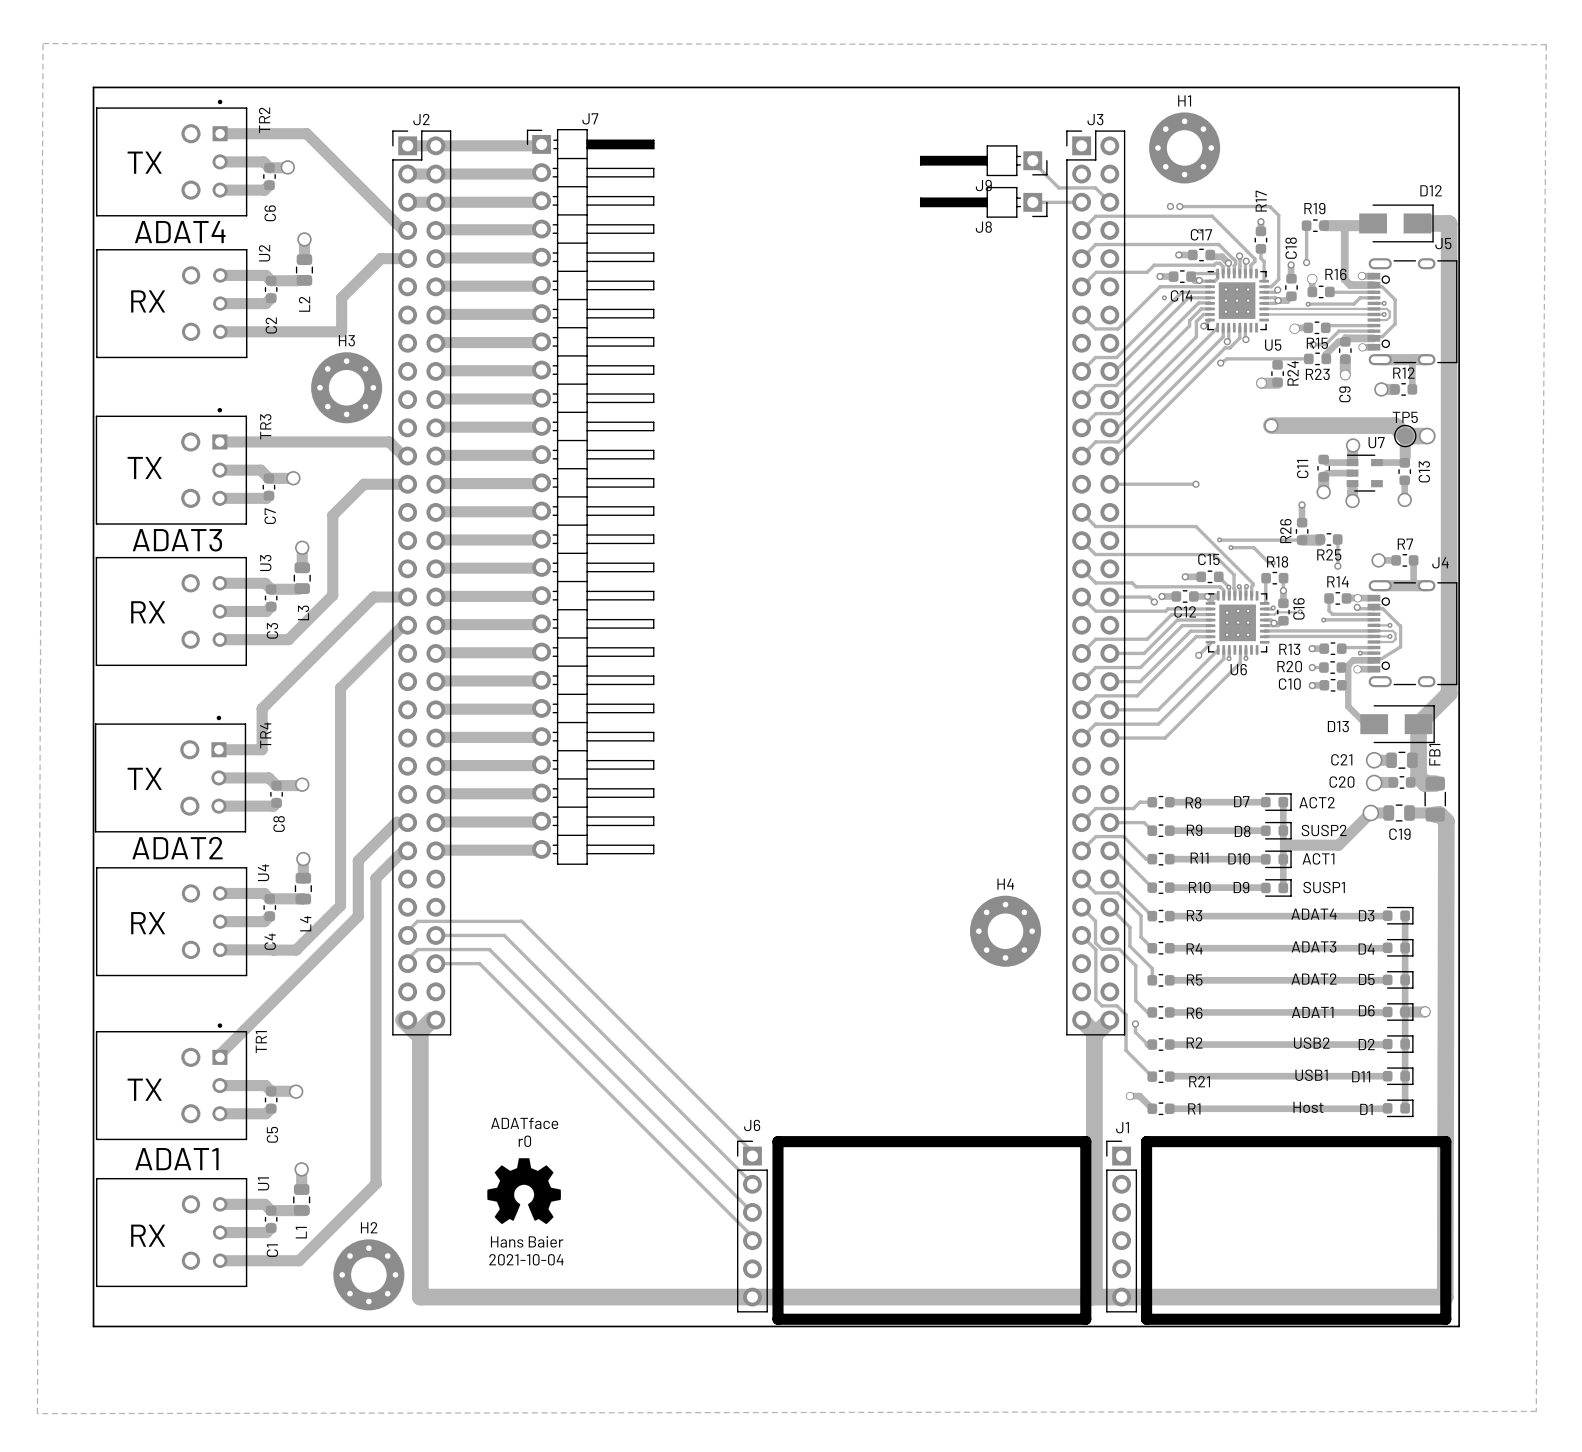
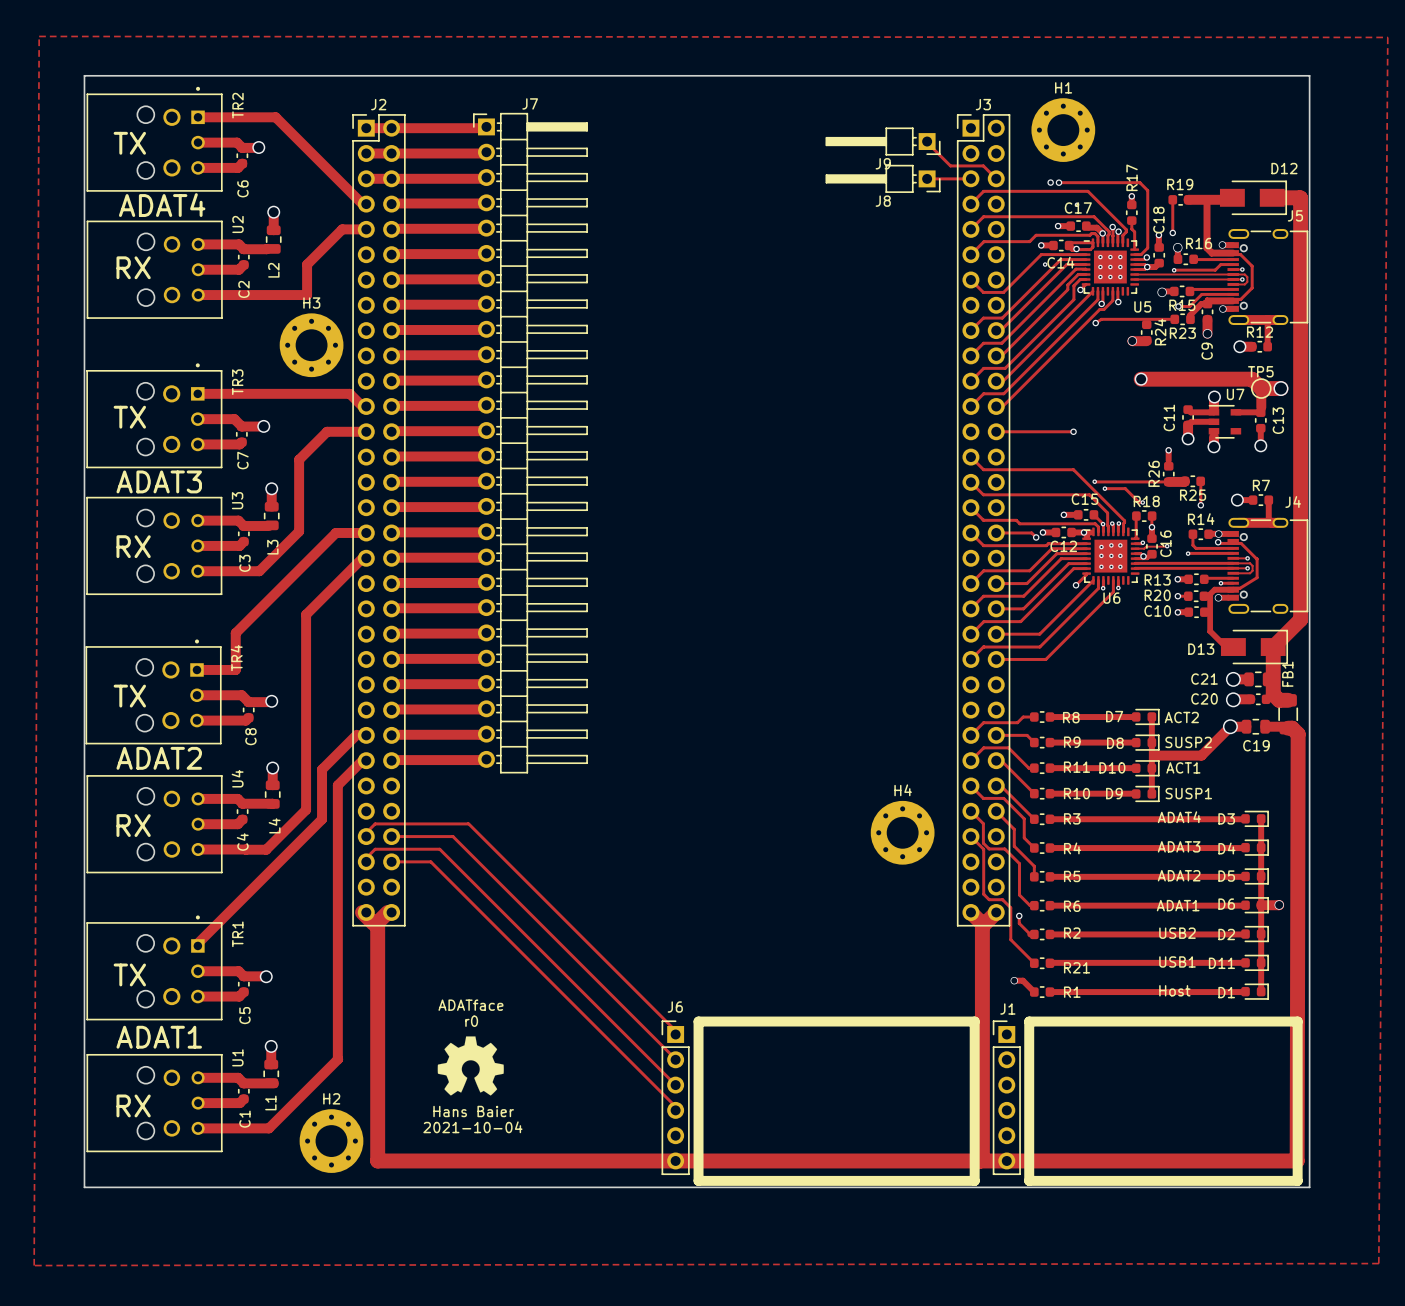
TR2 footprint: [96, 99, 248, 217] -> [86, 86, 223, 192]
U2 footprint: [96, 249, 248, 359] -> [86, 220, 223, 319]
TR3 footprint: [95, 407, 248, 525] -> [86, 363, 223, 469]
U3 footprint: [95, 556, 247, 667] -> [86, 496, 223, 595]
TR4 footprint: [94, 715, 247, 833] -> [85, 639, 222, 745]
U4 footprint: [95, 867, 248, 977] -> [86, 775, 223, 874]
TR1 footprint: [95, 1023, 248, 1141] -> [86, 915, 223, 1021]
U1 footprint: [95, 1177, 248, 1288] -> [86, 1054, 223, 1153]

